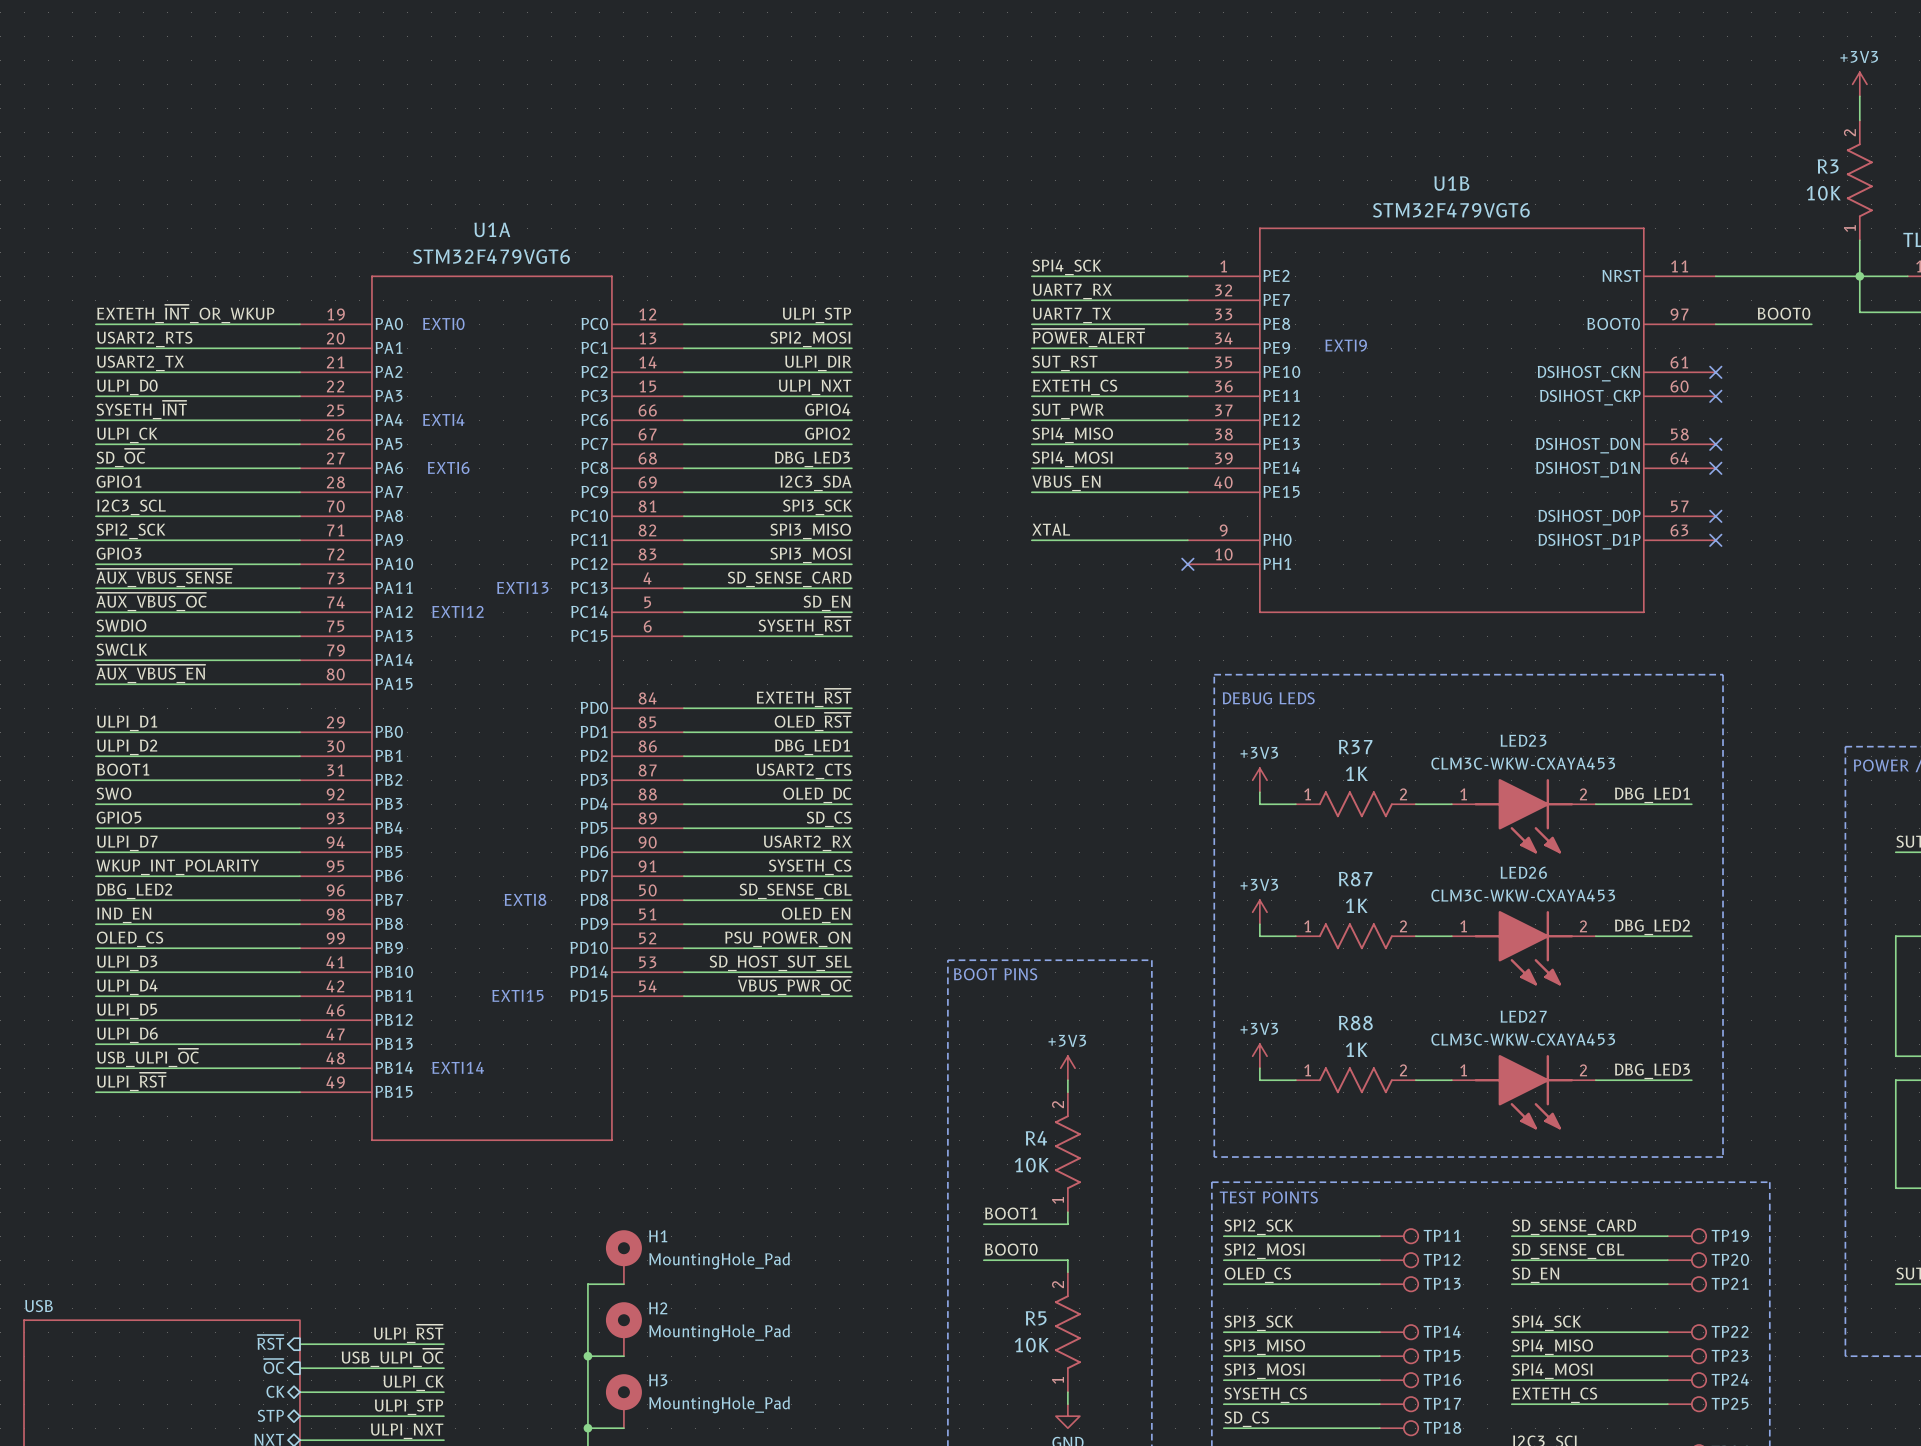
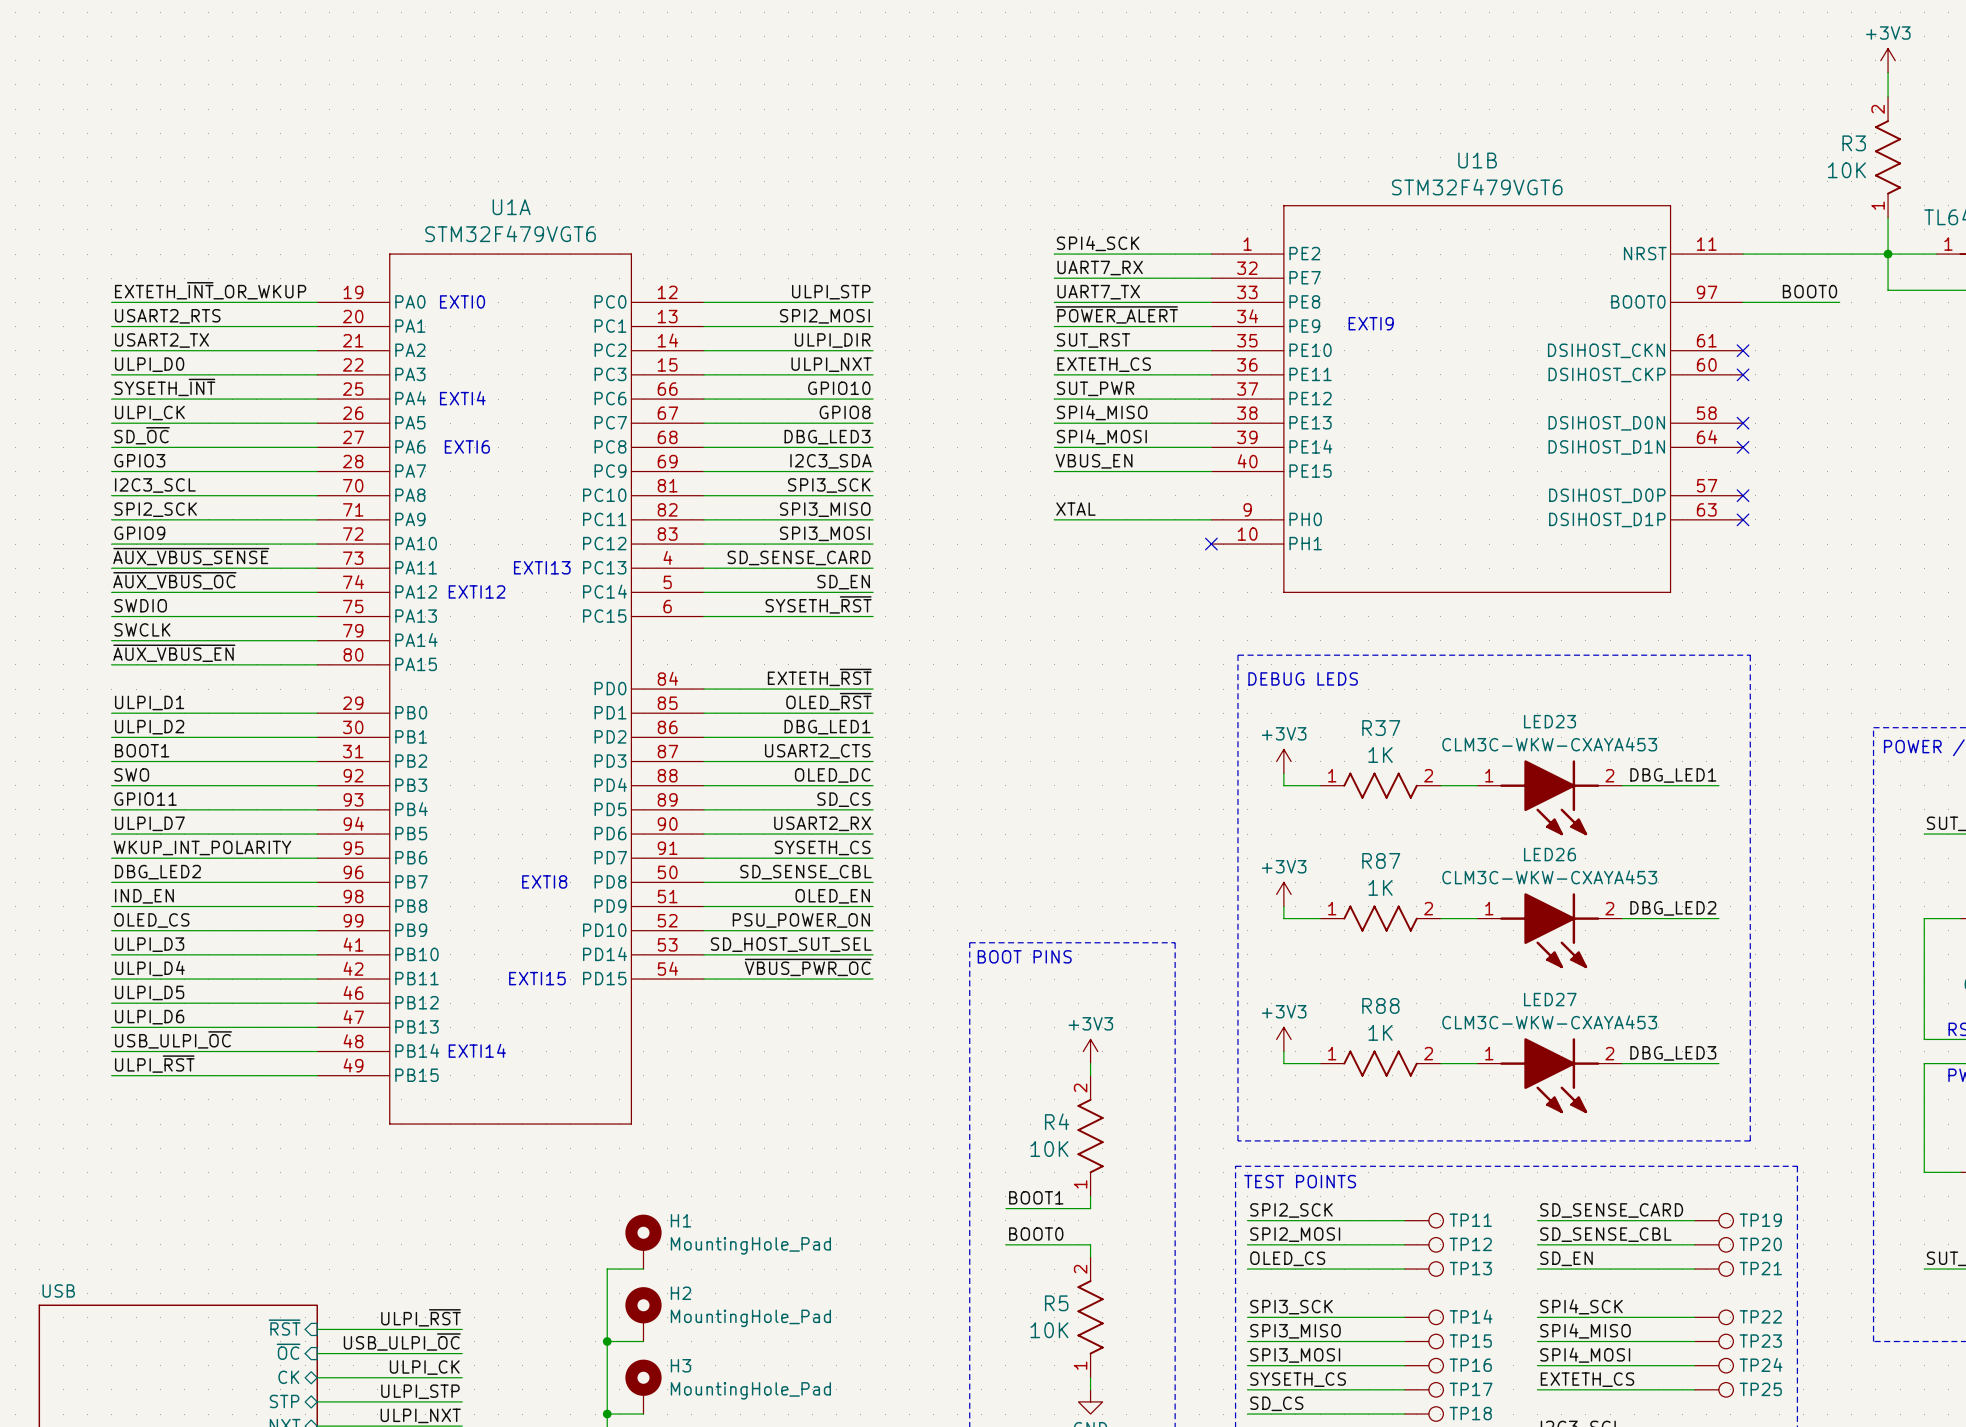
label: GPIO4 (827, 409) -> GPIO10 (839, 388)
label: GPIO2 (827, 433) -> GPIO8 (845, 412)
label: GPIO1 (119, 481) -> GPIO3 (139, 460)
label: GPIO3 (119, 553) -> GPIO9 (139, 533)
label: GPIO5 (119, 817) -> GPIO11 (145, 799)

